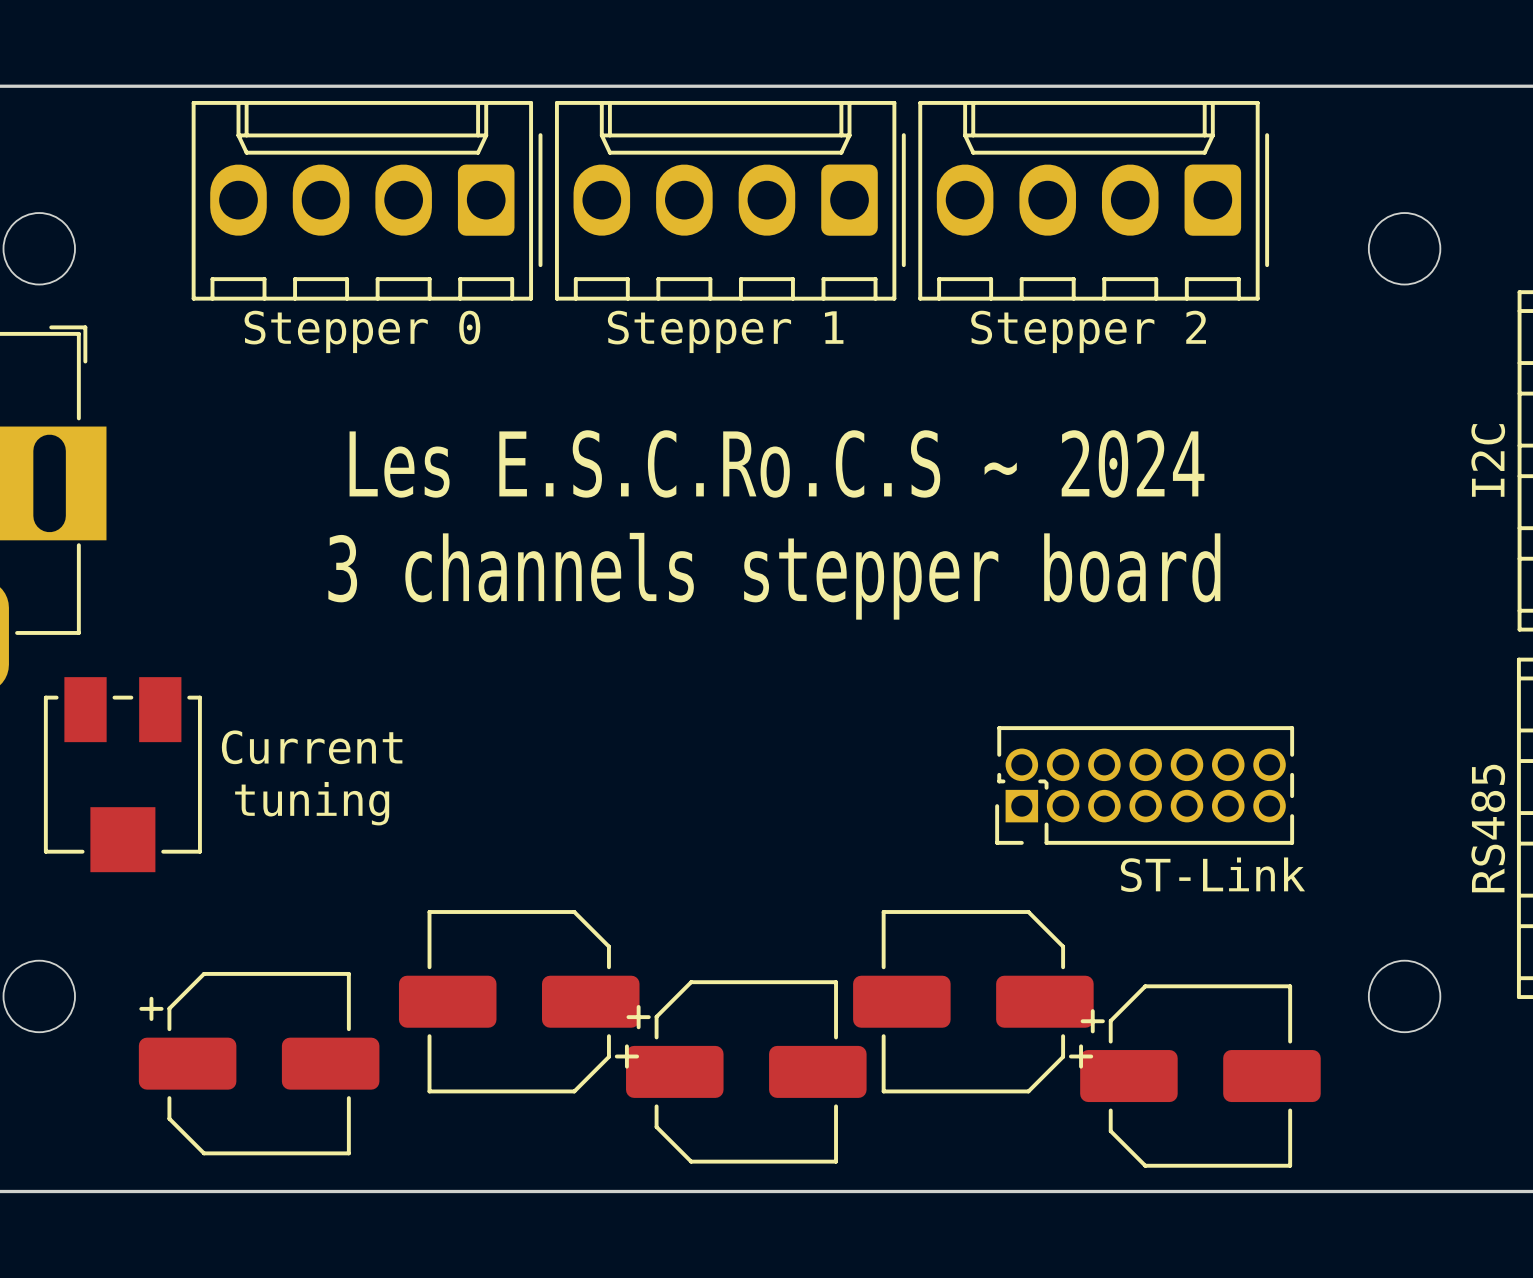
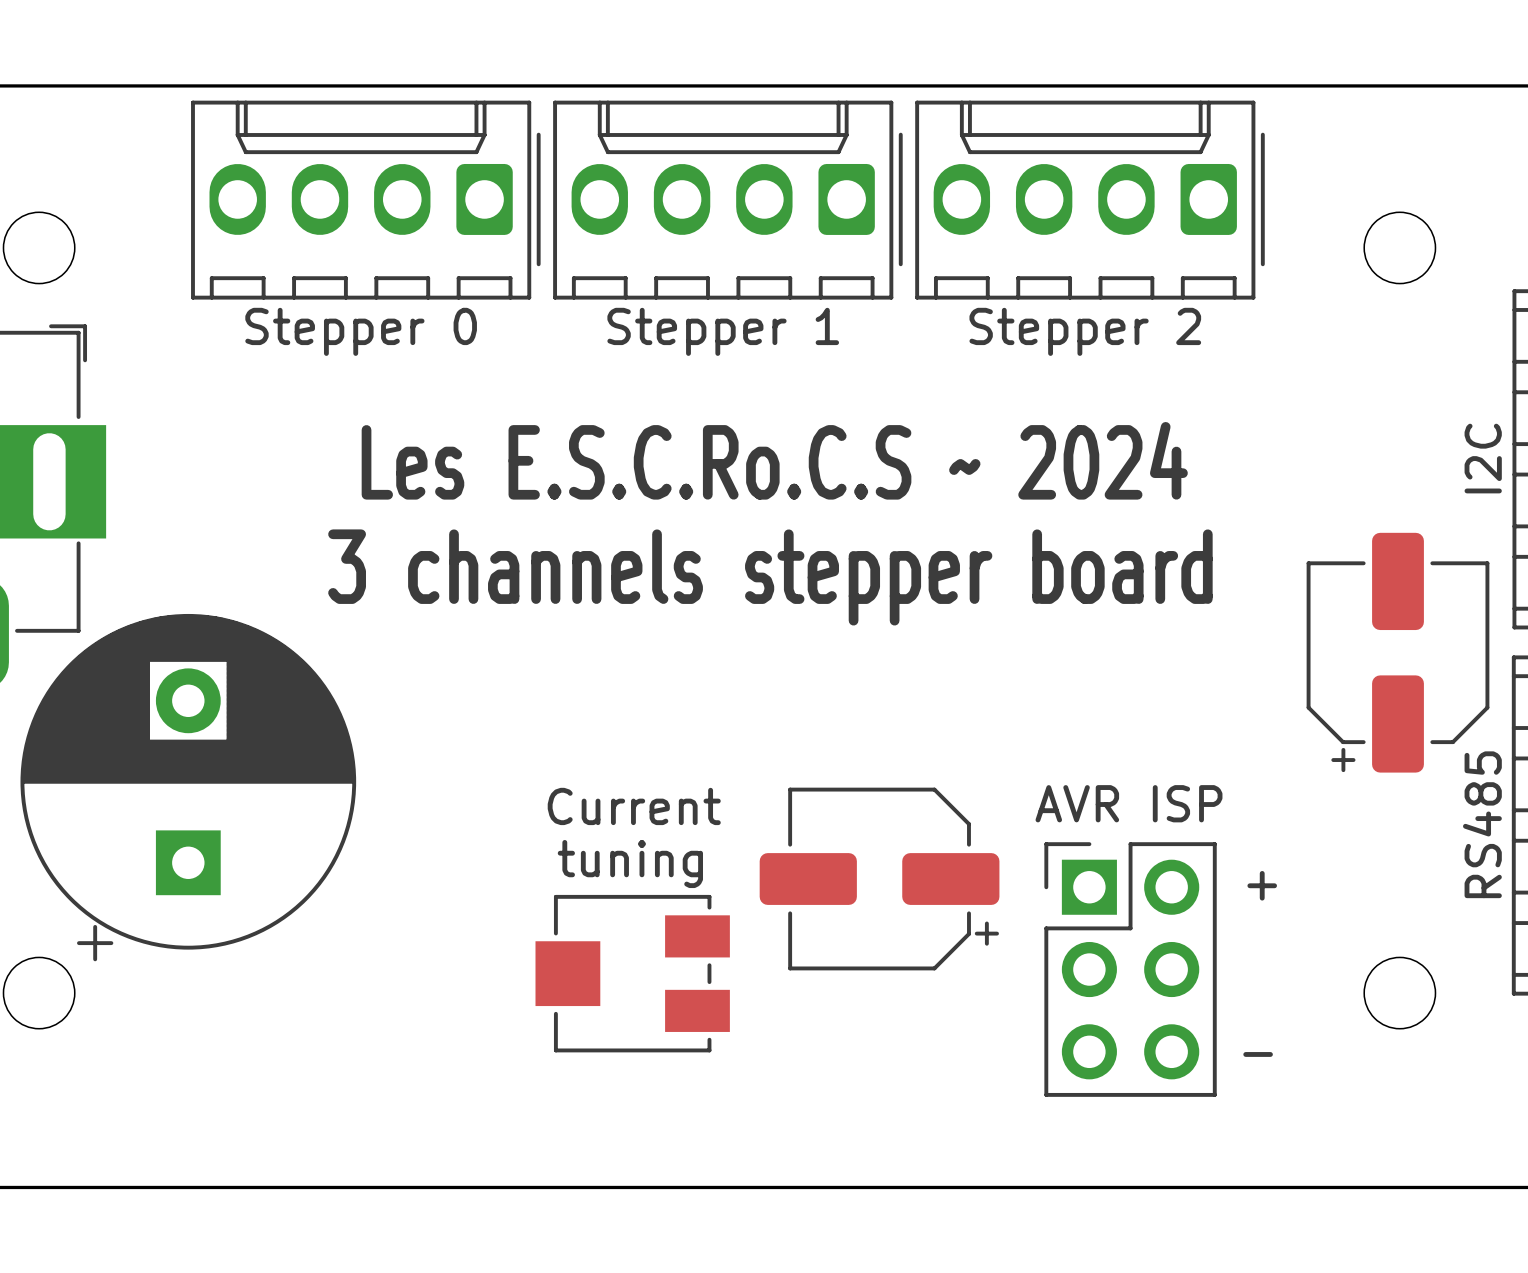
part: none -> (1398, 652)
text position: Current (312, 747) -> Current (634, 806)
part rotation: 0° (122, 774) -> 90° clockwise (632, 973)
part position: (122, 774) -> (632, 973)
part: (1144, 785) -> none
part: none -> (188, 787)
text position: tuning (312, 803) -> tuning (630, 864)
text: none -> AVR ISP (1129, 803)
text: ST-Link (1212, 874) -> none
part: none -> (879, 879)
text: none -> + (1262, 885)
part: none -> (1130, 969)
part: (519, 1001) -> none
part: (973, 1001) -> none
text: none -> - (1258, 1054)
part: (259, 1063) -> none
part: (746, 1071) -> none
part: (1200, 1076) -> none

